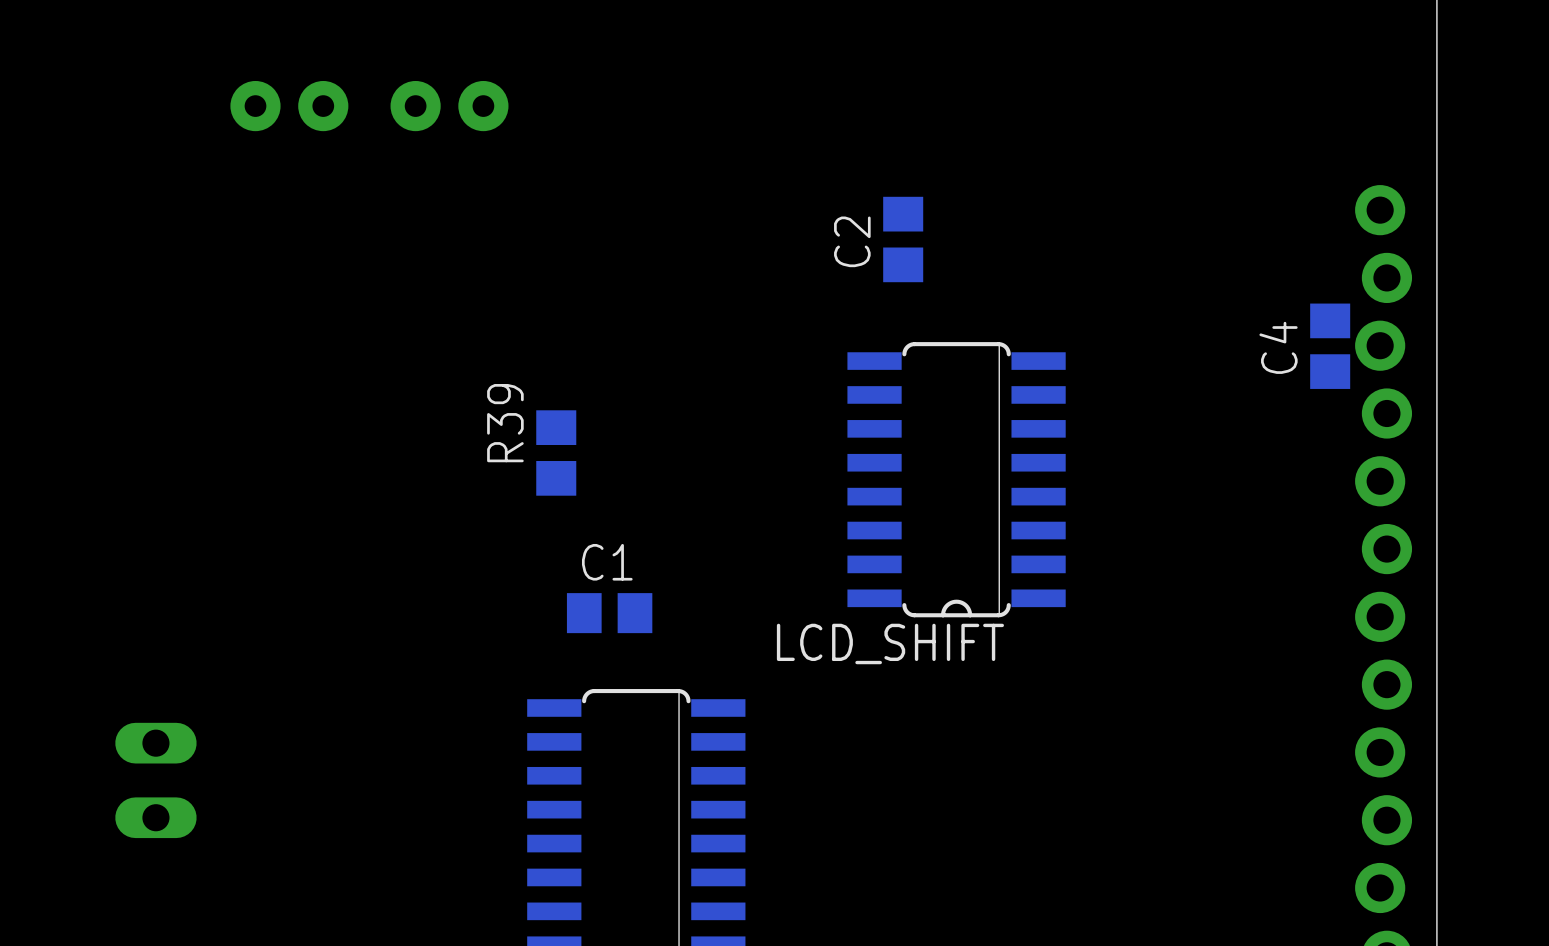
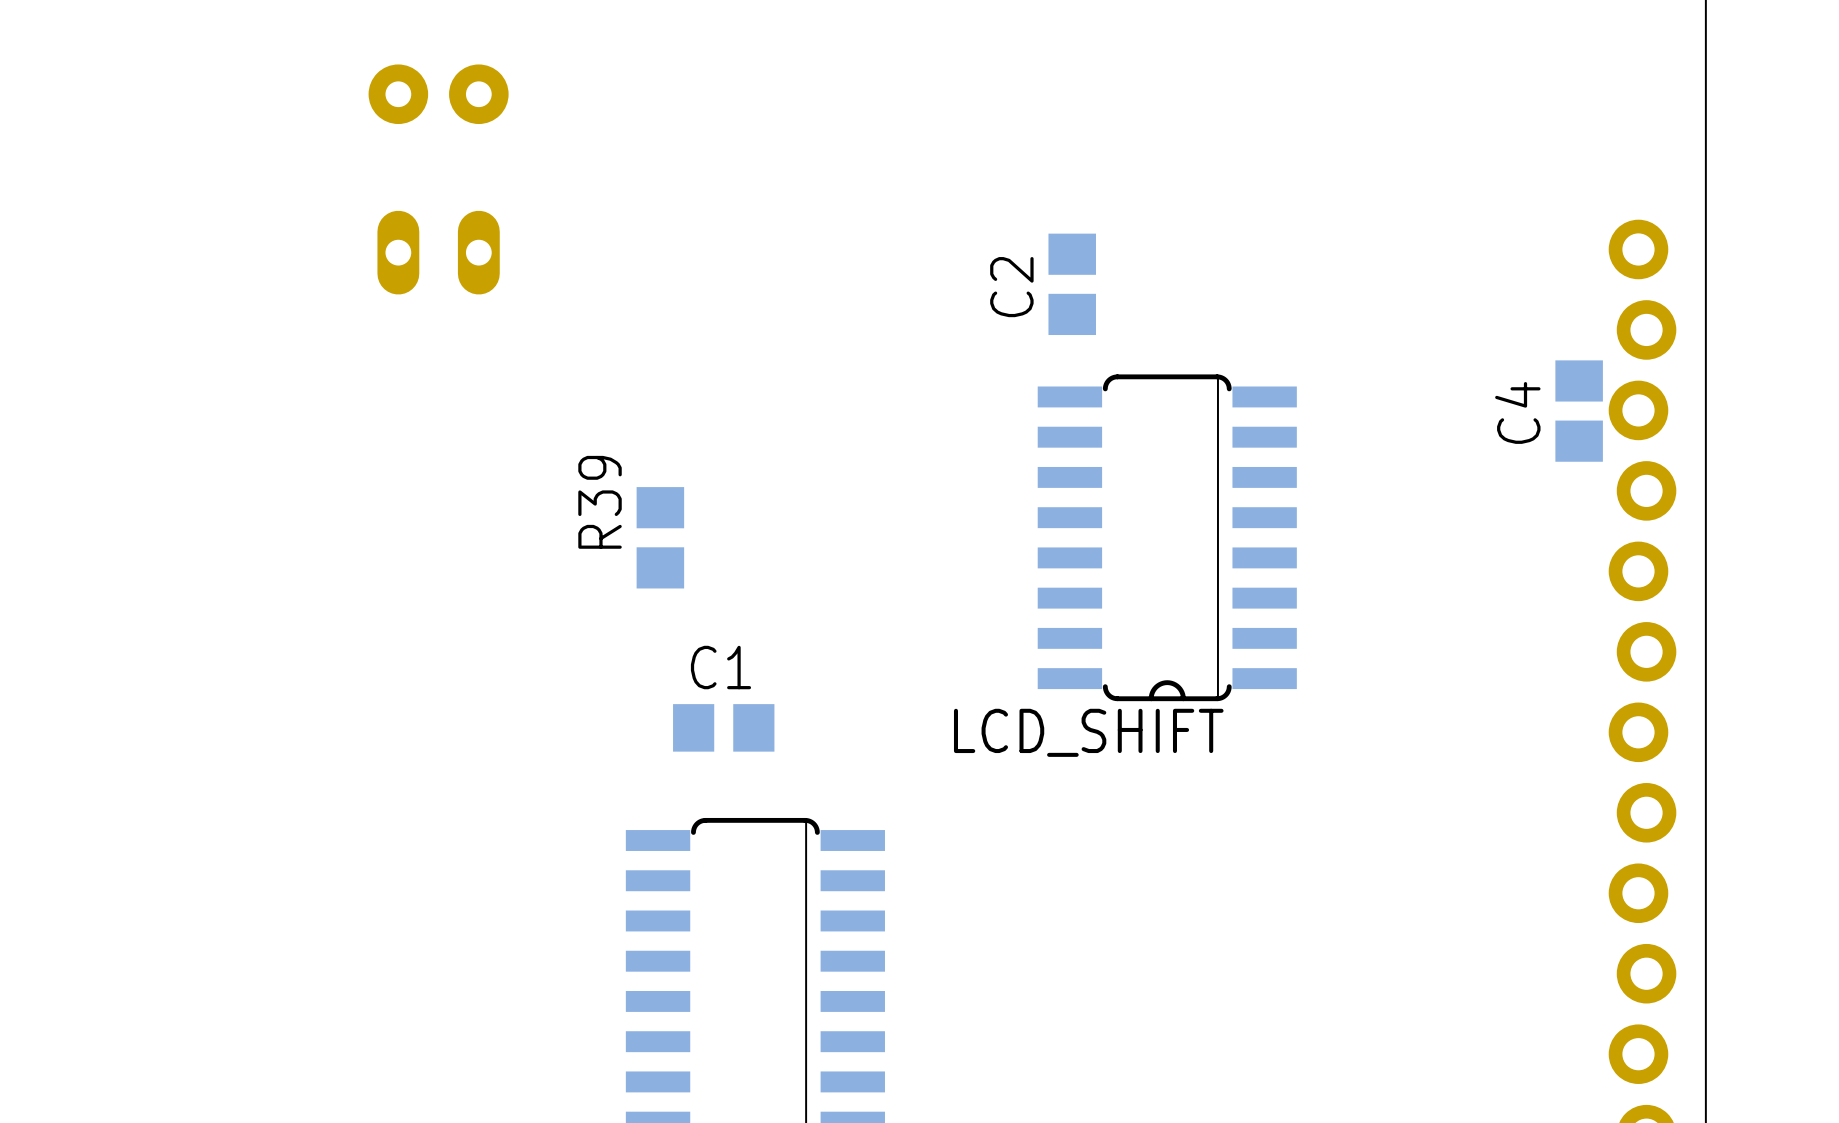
part: none -> (438, 94)
part: (289, 106) -> none
part: (449, 106) -> none
part: none -> (438, 252)
LCD_SHIFT position: (956, 479) -> (1167, 537)
part: (155, 780) -> none

